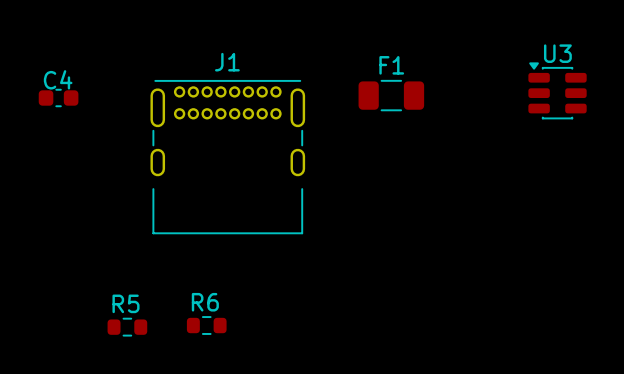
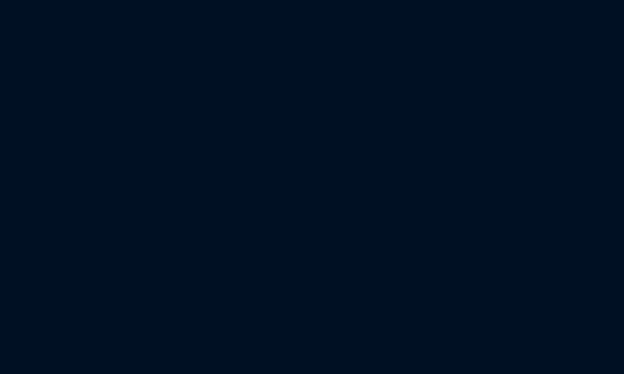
U3: (557, 90) -> none
F1: (391, 95) -> none
C4: (58, 98) -> none
J1: (227, 157) -> none
R6: (206, 325) -> none
R5: (127, 327) -> none

